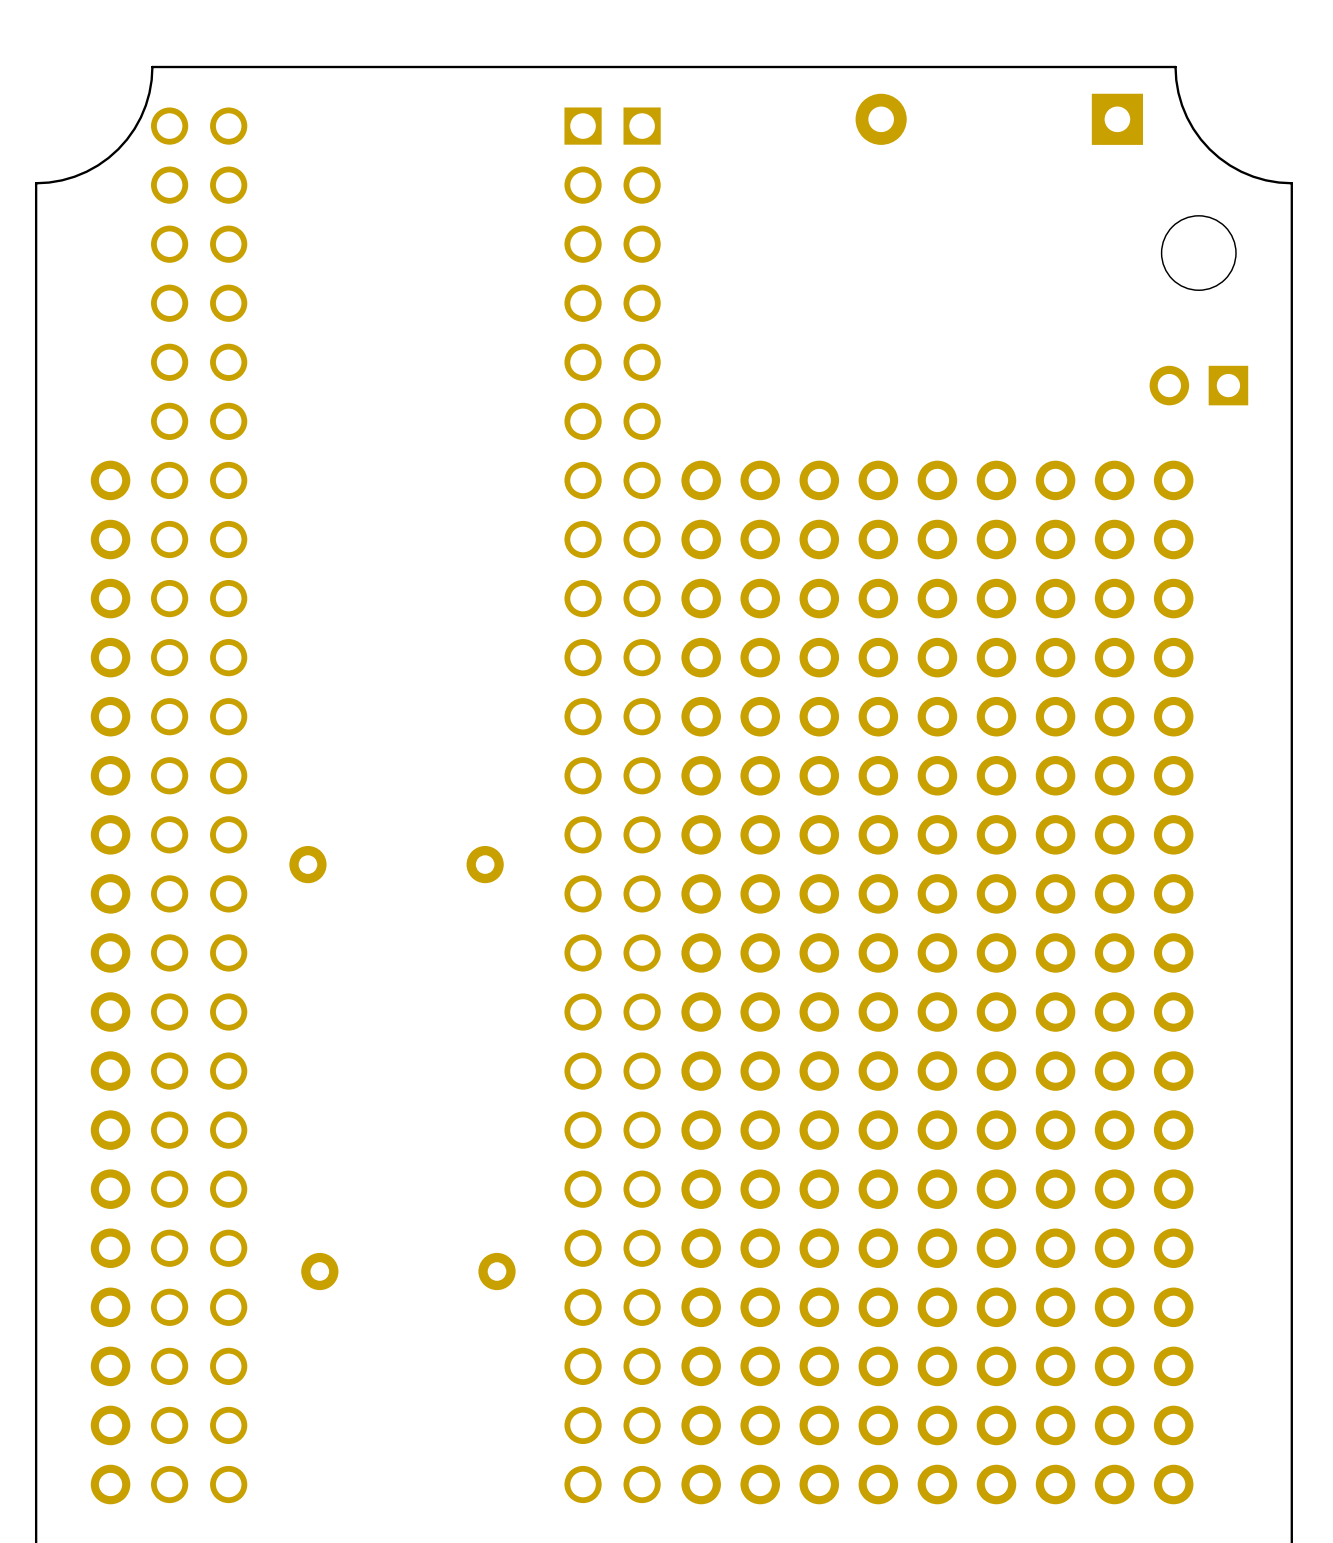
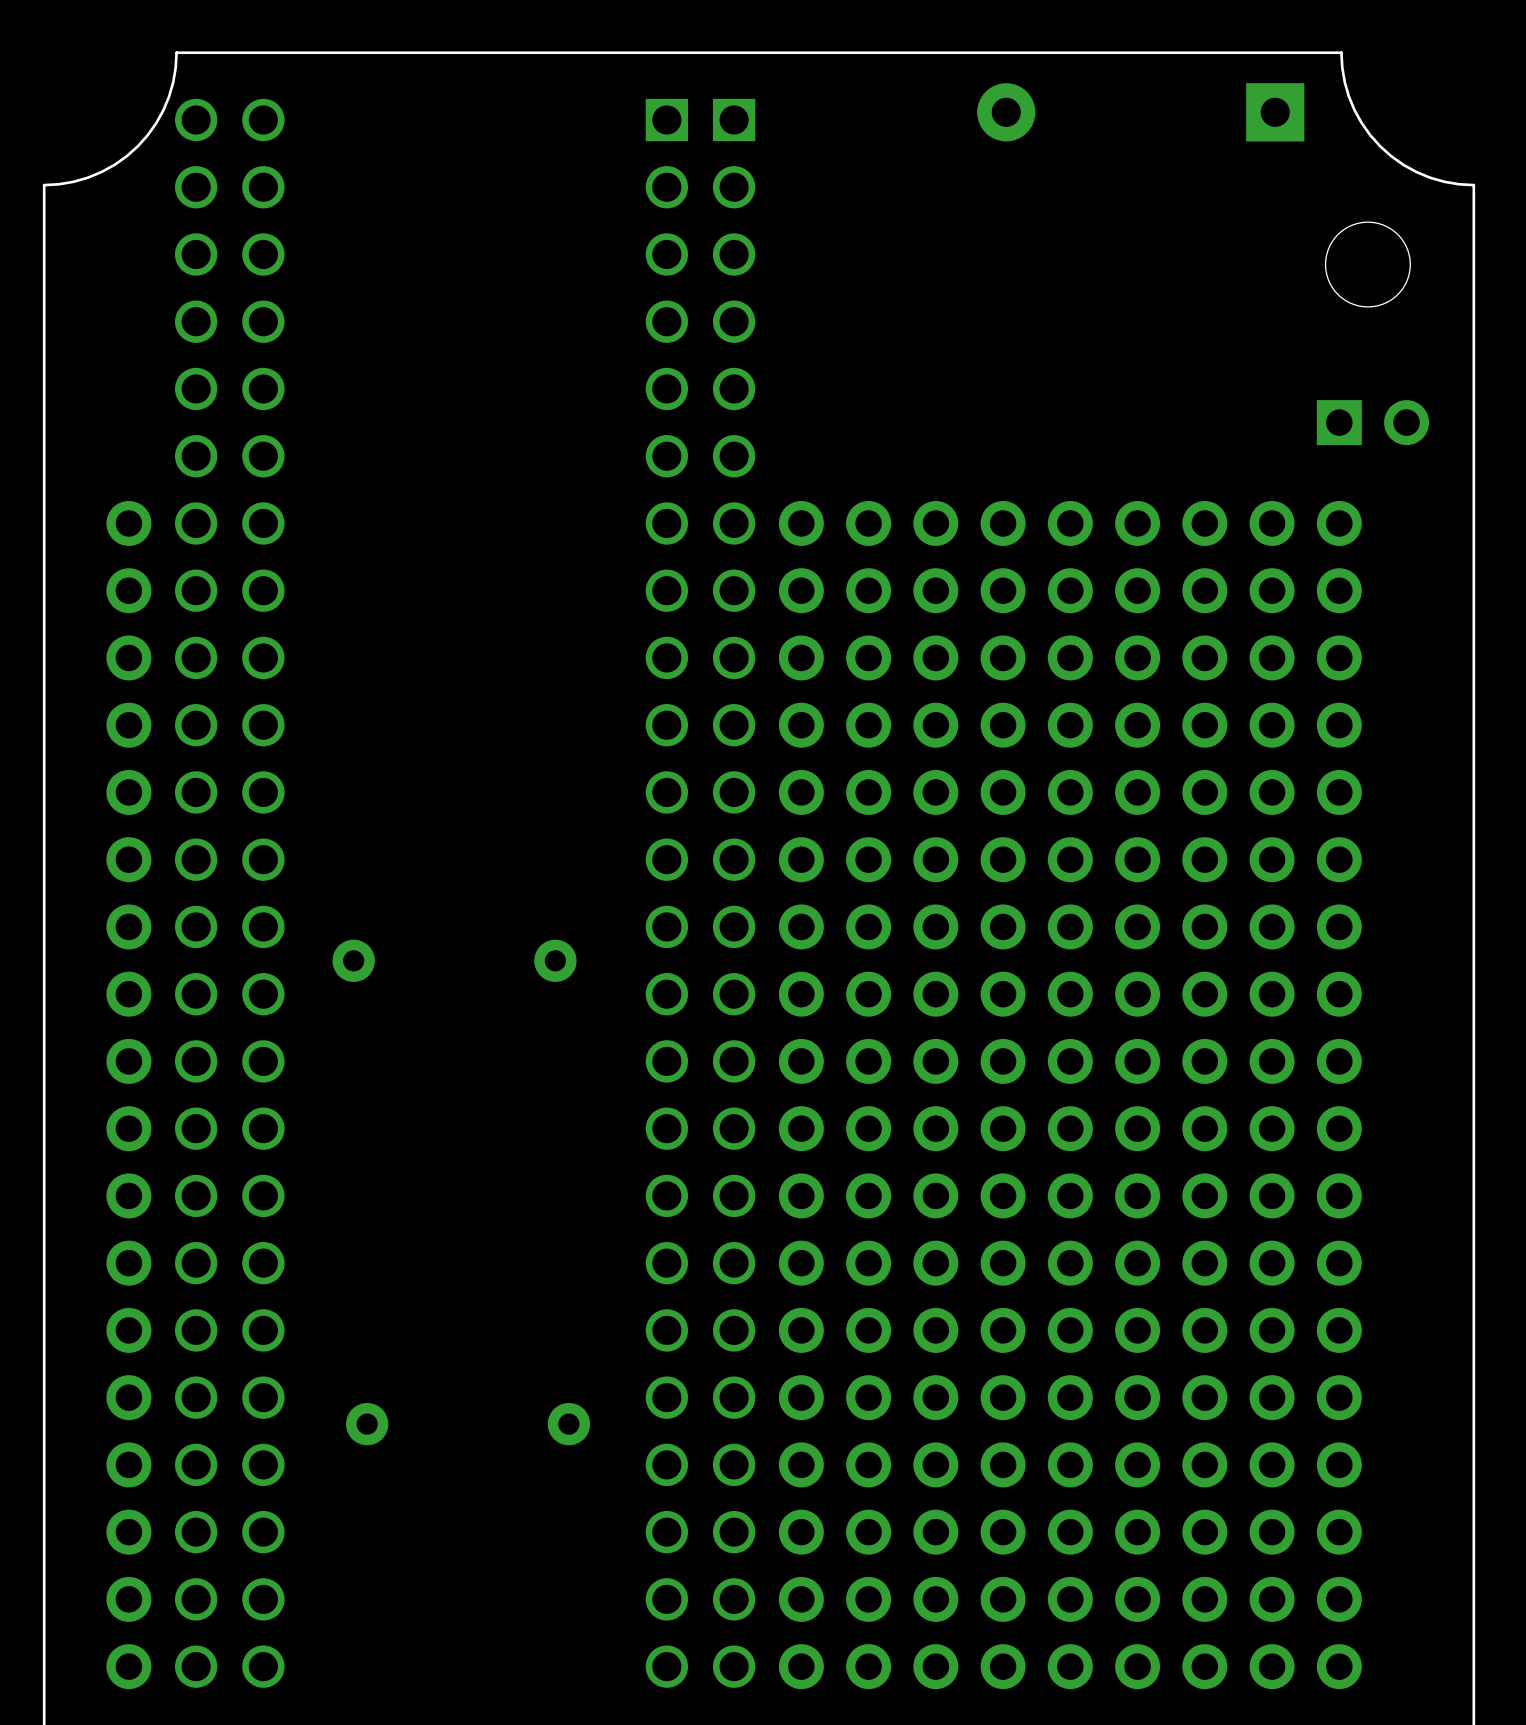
part rotation: 0° (1198, 385) -> 180° (1372, 422)

